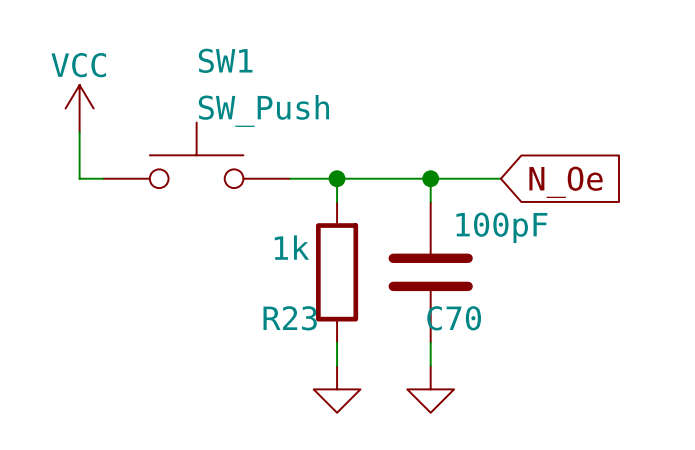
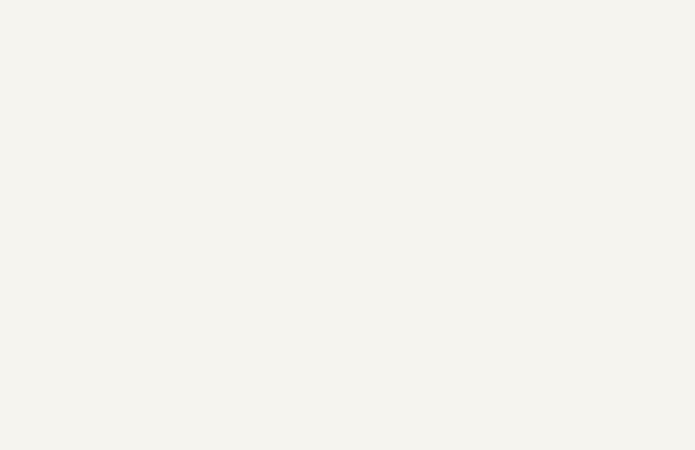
power symbol: VCC (79, 108) -> none
wire: (79, 131) (79, 178) (103, 178) -> none
SW1: SW_Push (196, 155) -> none
wire: (290, 178) (500, 178) -> none
wire: (337, 178) (337, 202) -> none
junction: (337, 178) -> none
wire: (430, 178) (430, 202) -> none
junction: (430, 178) -> none
global label: N_Oe (566, 182) -> none
R23: 1k (337, 272) -> none
C70: 100pF (430, 272) -> none
wire: (337, 342) (337, 365) -> none
wire: (430, 342) (430, 365) -> none
power symbol: (337, 389) -> none
power symbol: (430, 389) -> none

